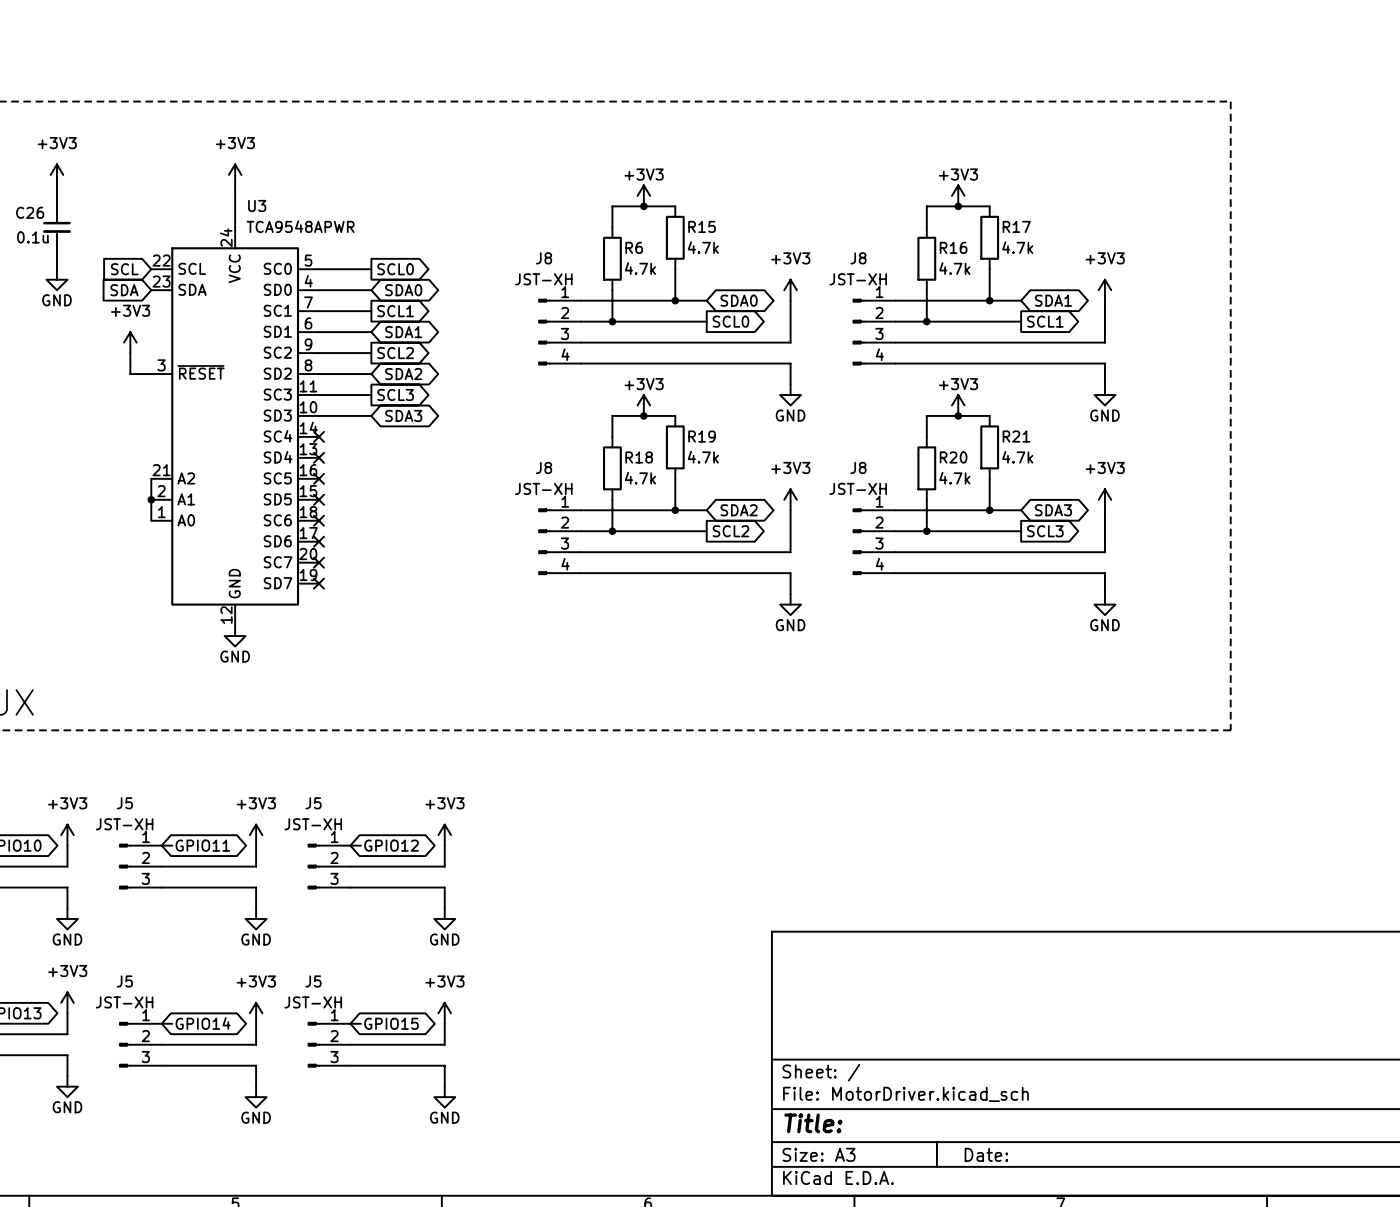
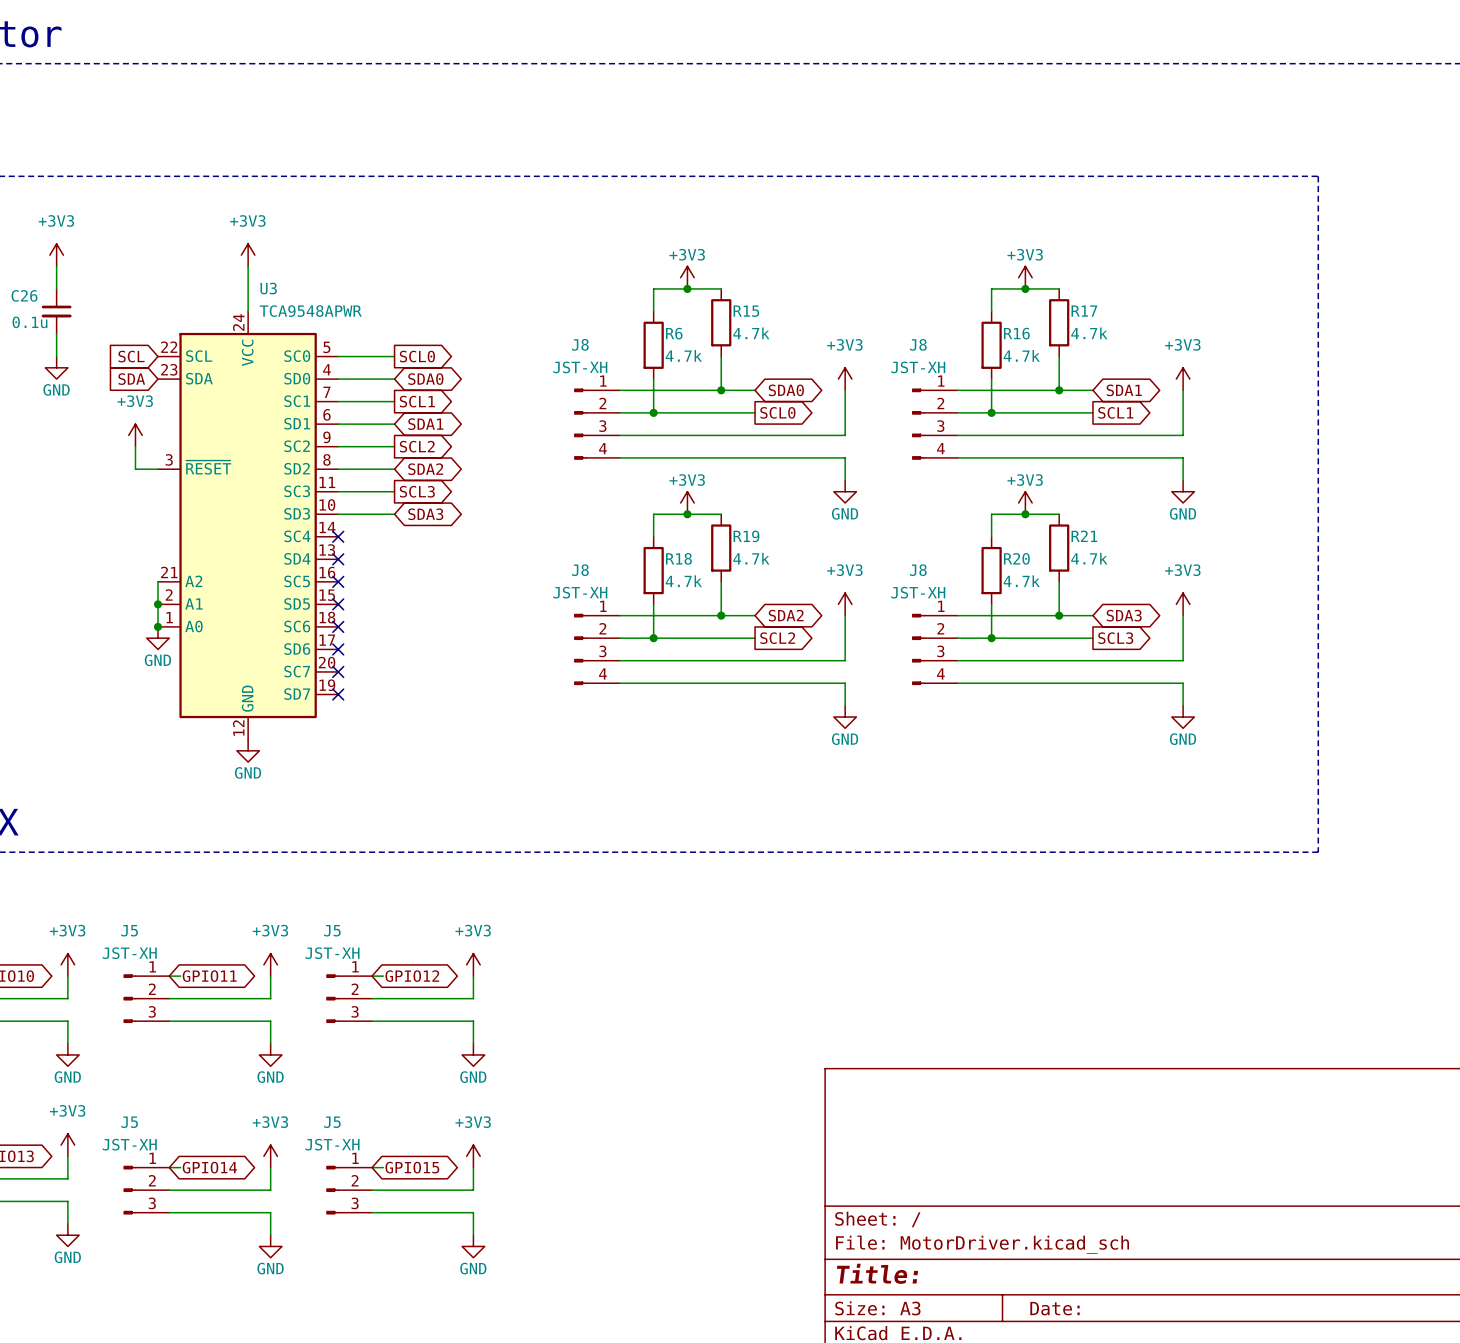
junction: none -> (158, 626)
power symbol: none -> GND (158, 638)

